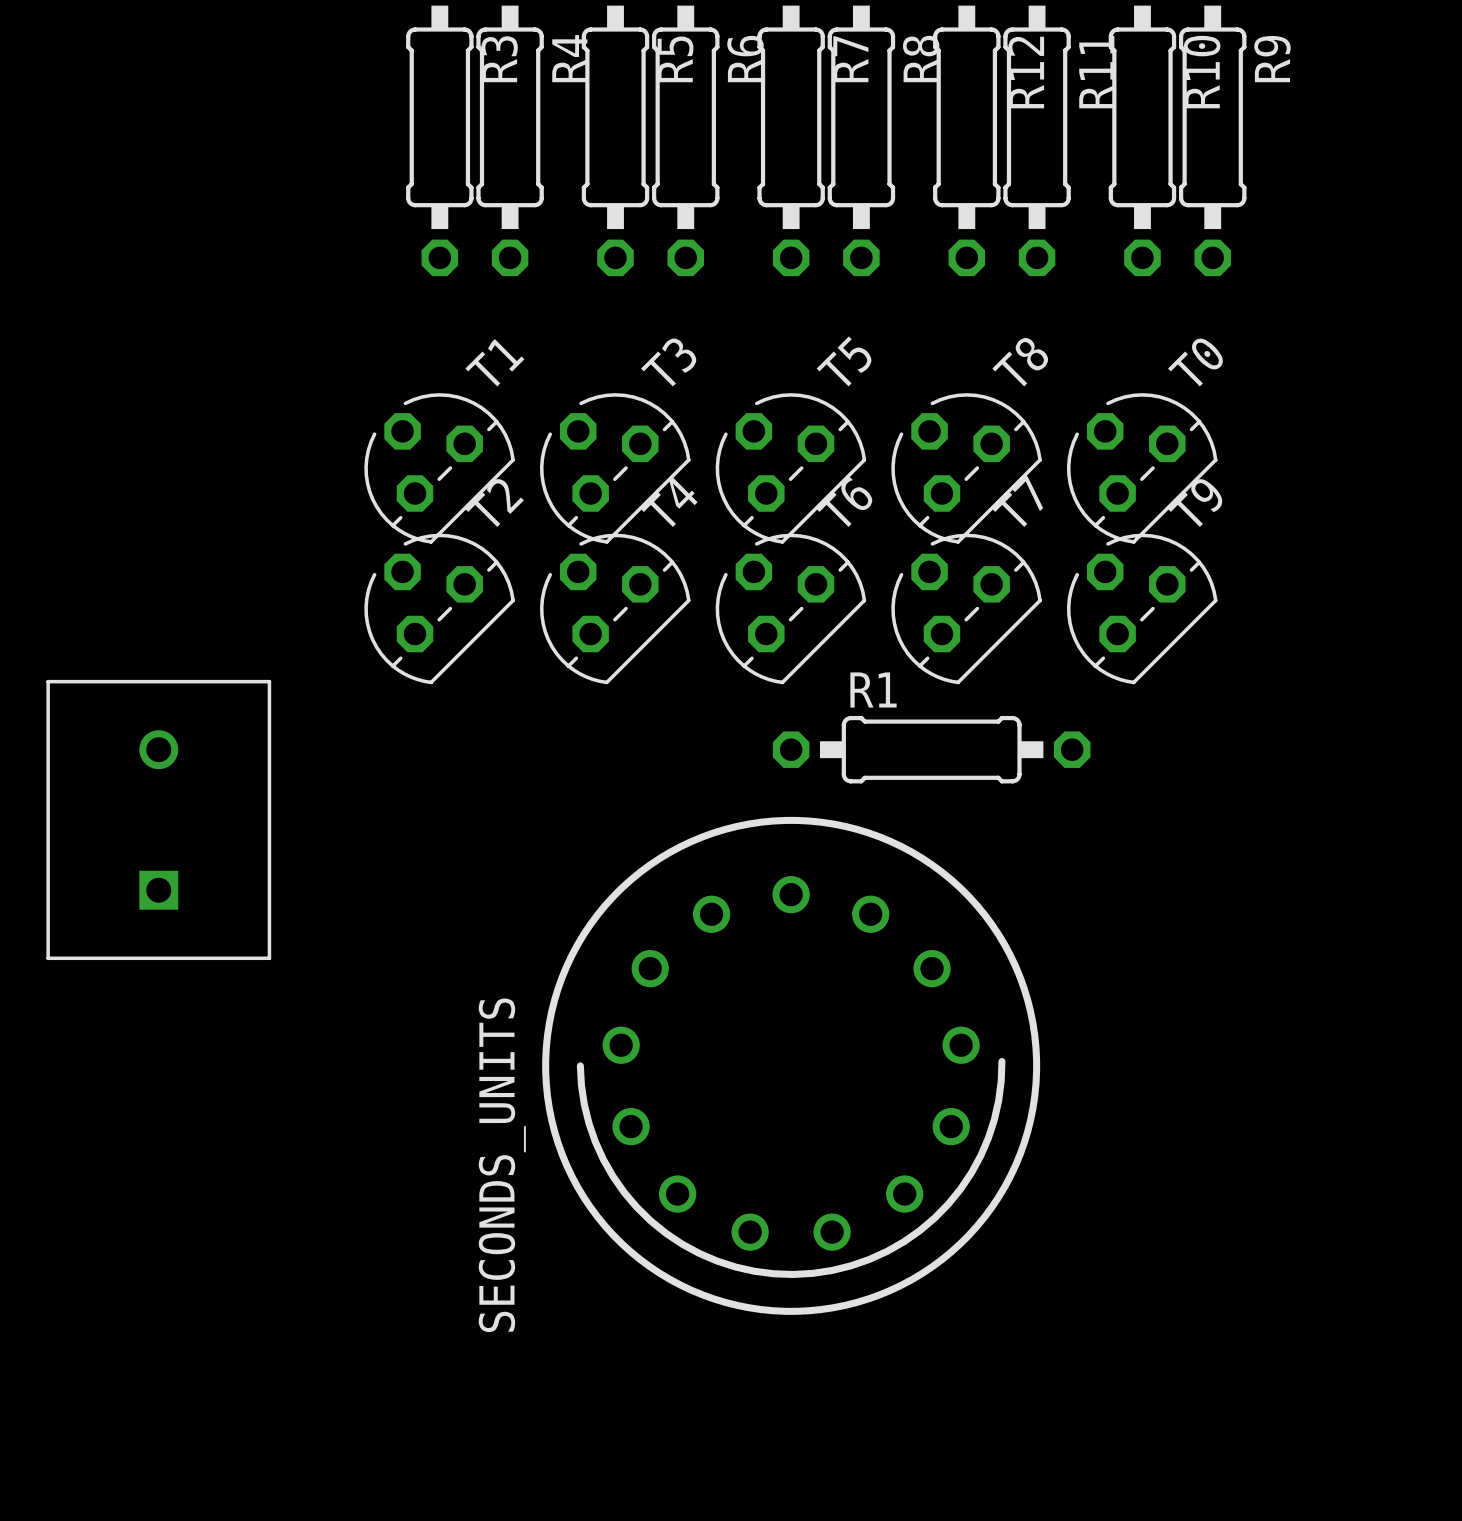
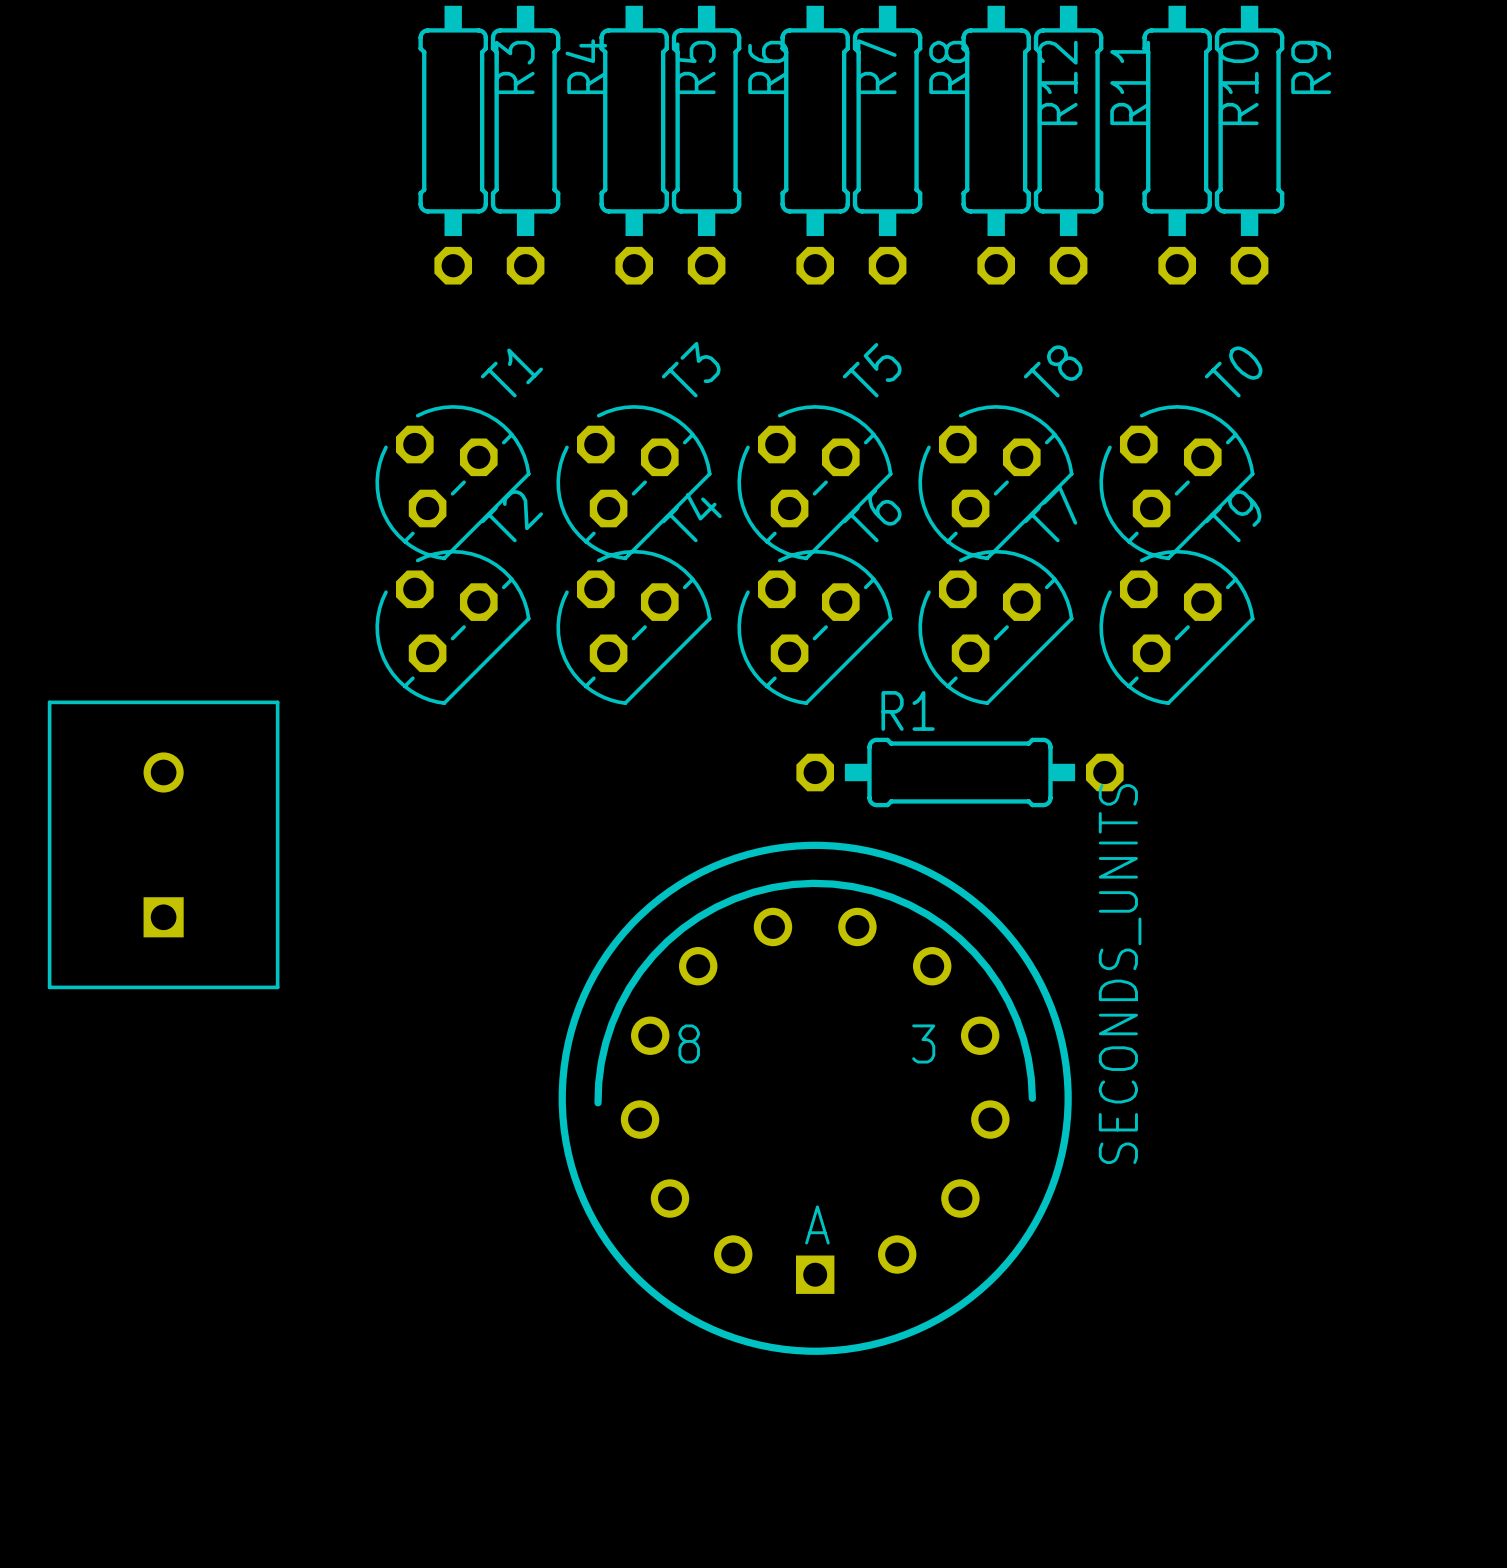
SECONDS_UNITS footprint: [542, 816, 1041, 1315] -> [558, 841, 1072, 1355]
SECONDS_UNITS name position: SECONDS_UNITS (502, 1165) -> SECONDS_UNITS (1120, 974)

